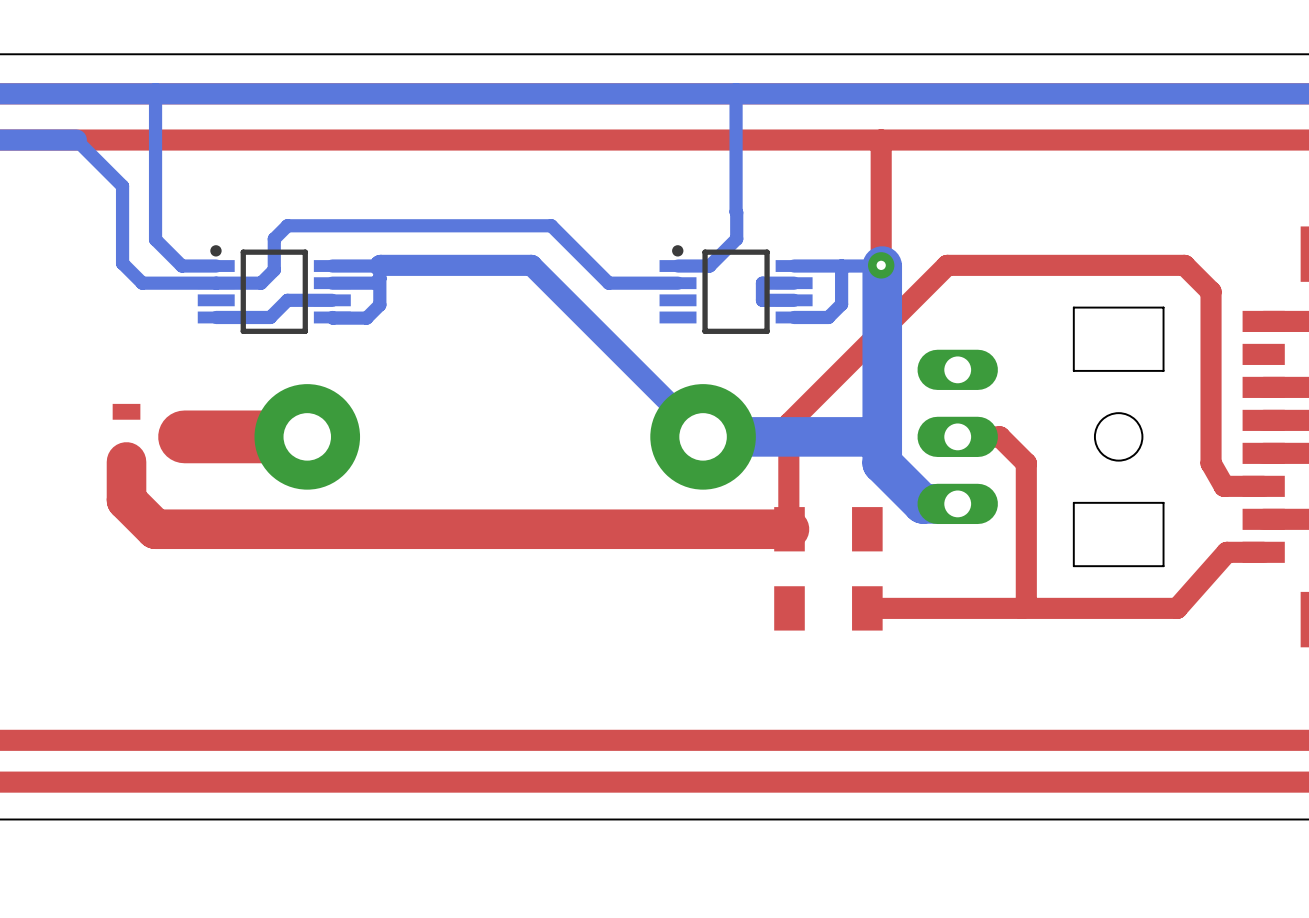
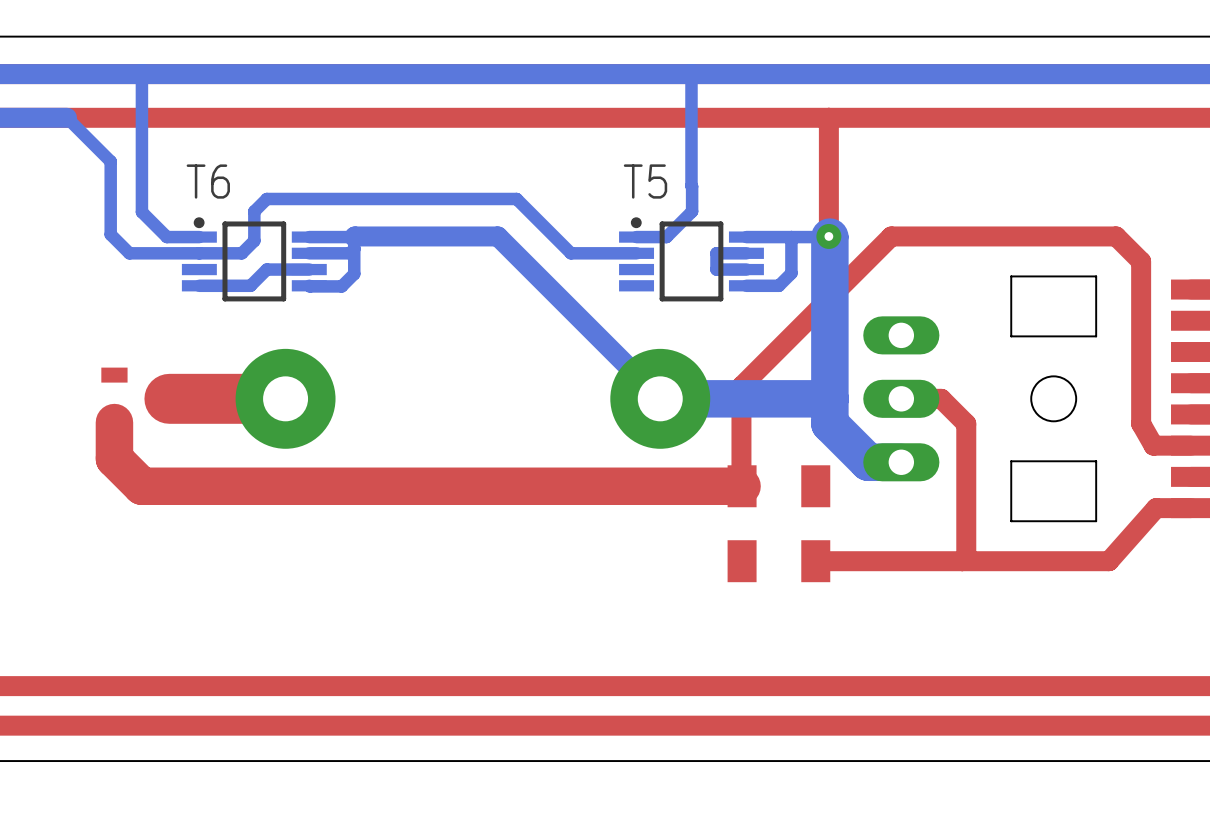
T6 name: none -> T6 (208, 181)
T5 name: none -> T5 (645, 181)

